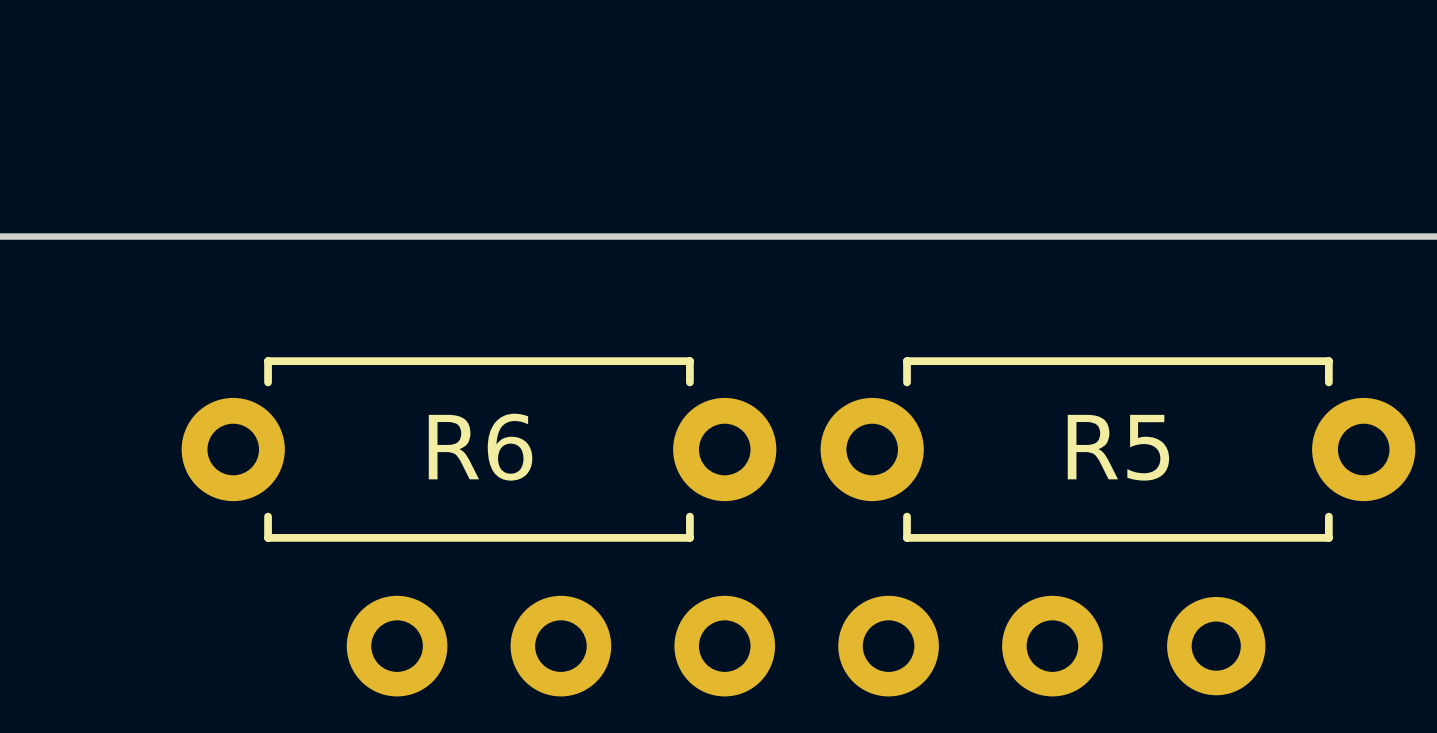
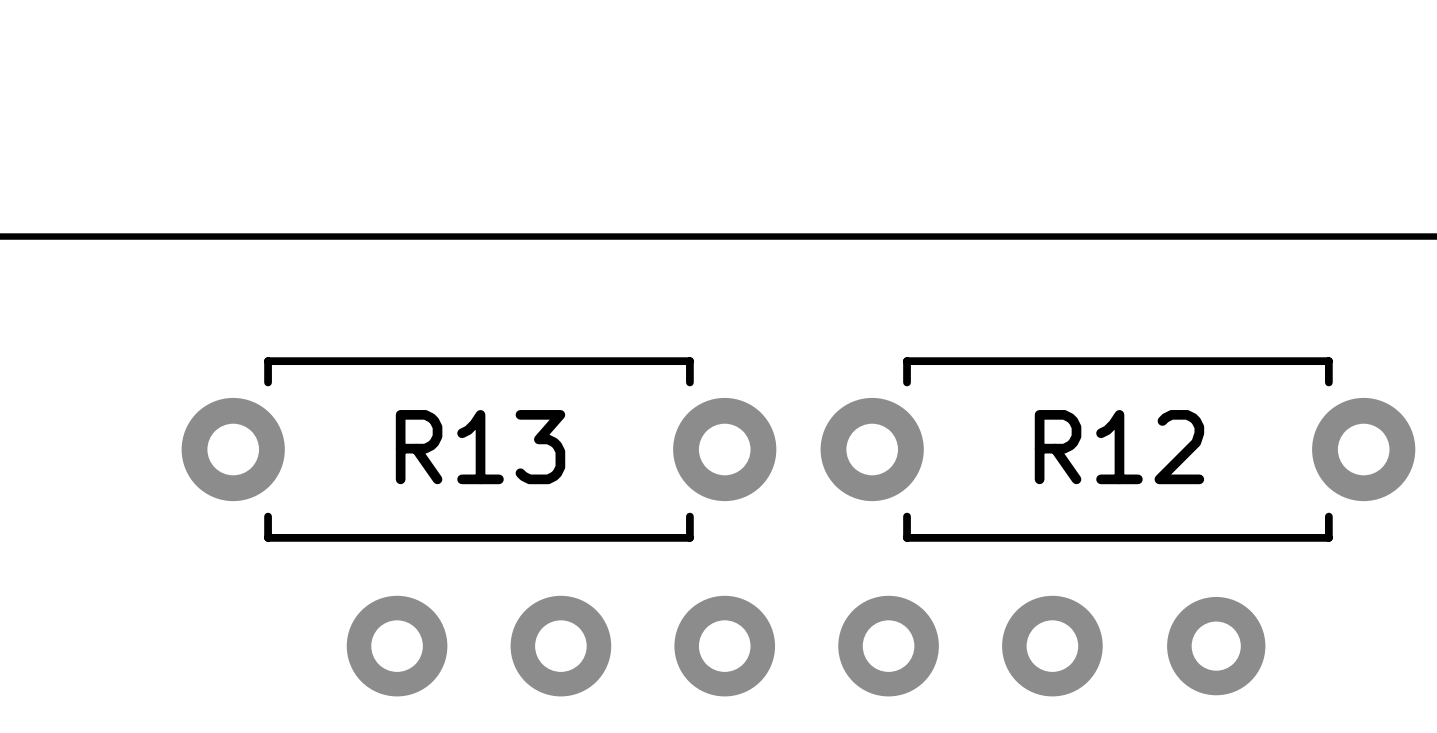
R6 name: R6 (480, 447) -> R13 (480, 447)
R5 name: R5 (1118, 447) -> R12 (1119, 447)

